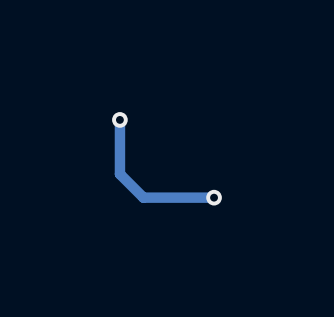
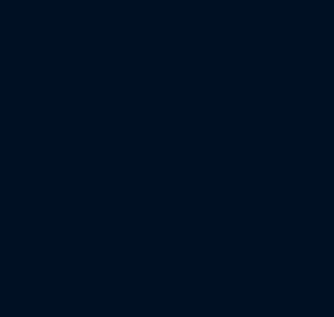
via: (119, 119) -> none
track: (119, 120) (119, 174) (143, 197) (213, 197) -> none
via: (214, 197) -> none

